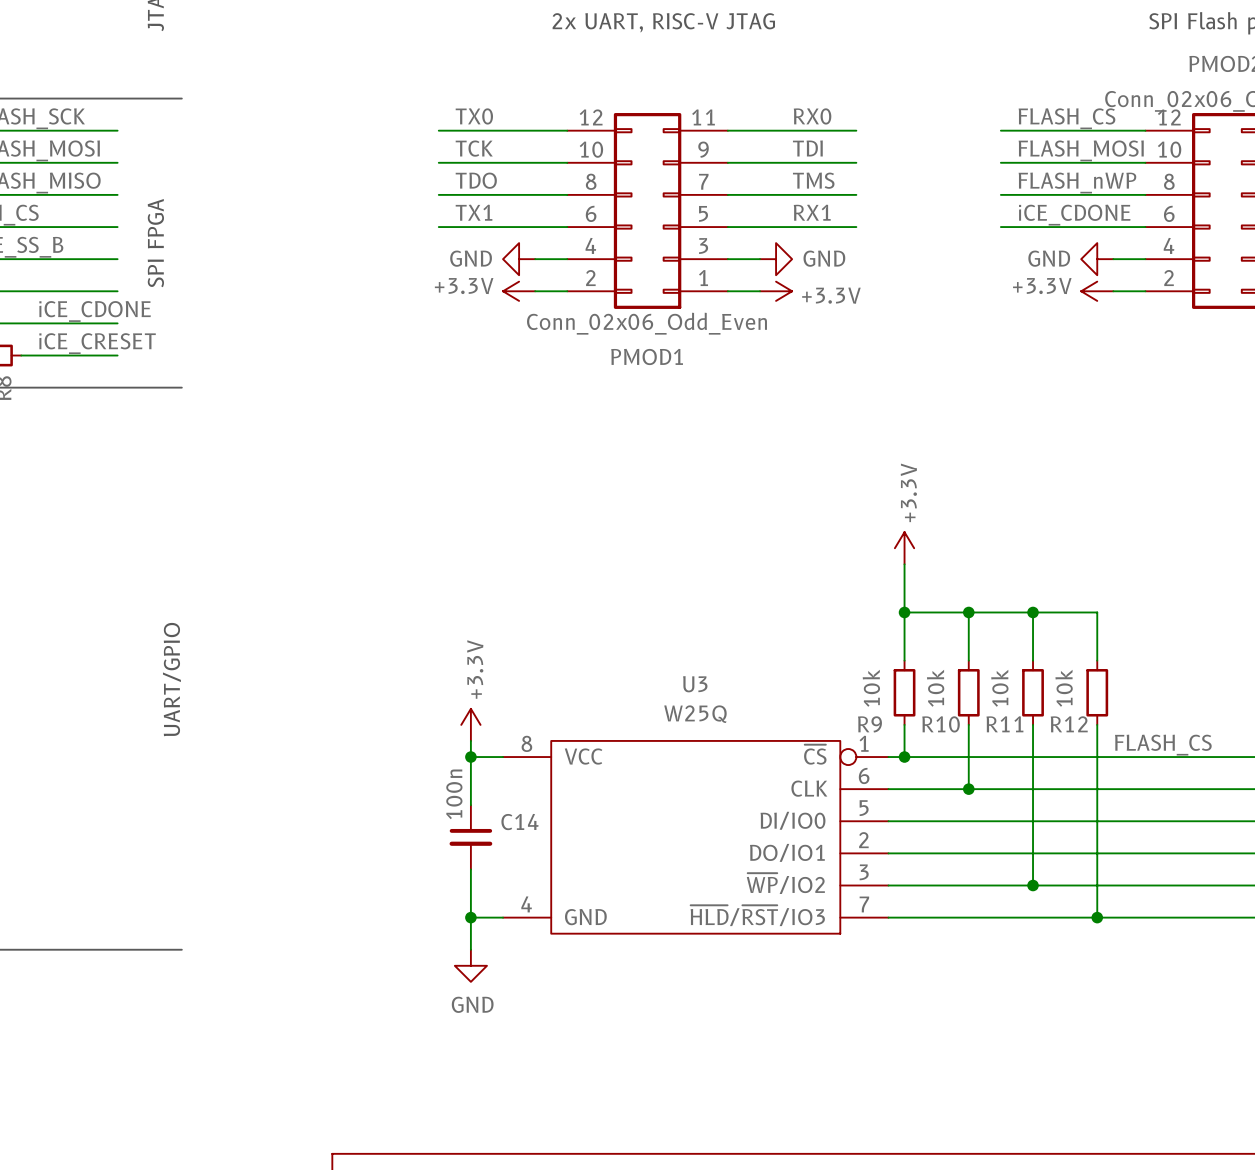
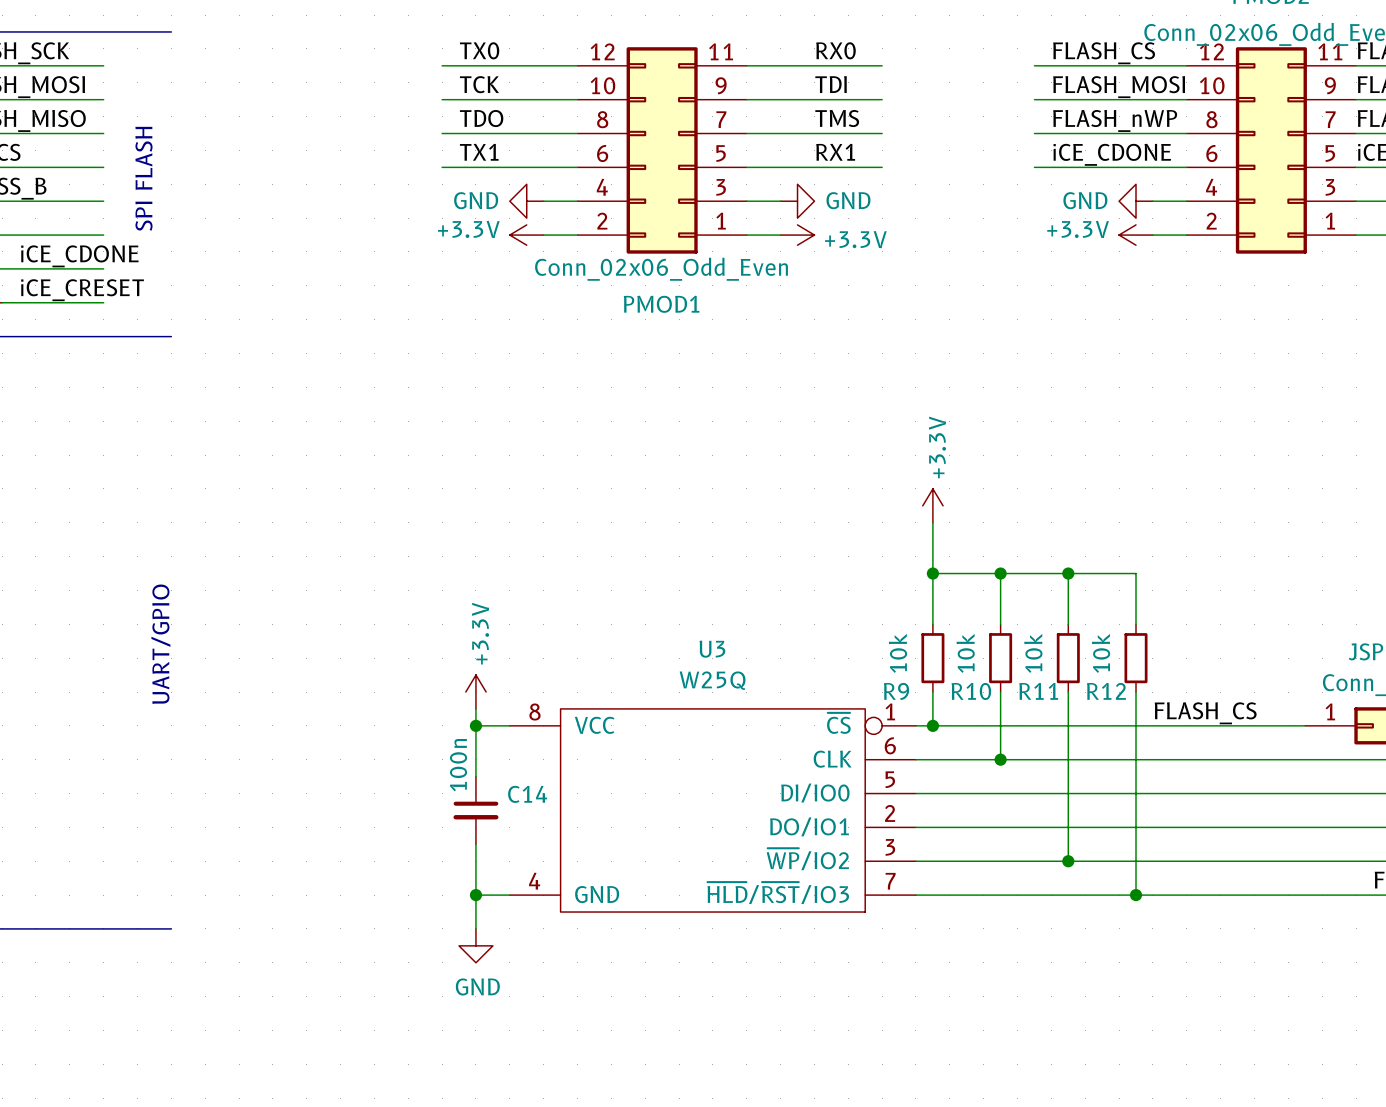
text: SPI FPGA (155, 243) -> SPI FLASH (143, 178)

